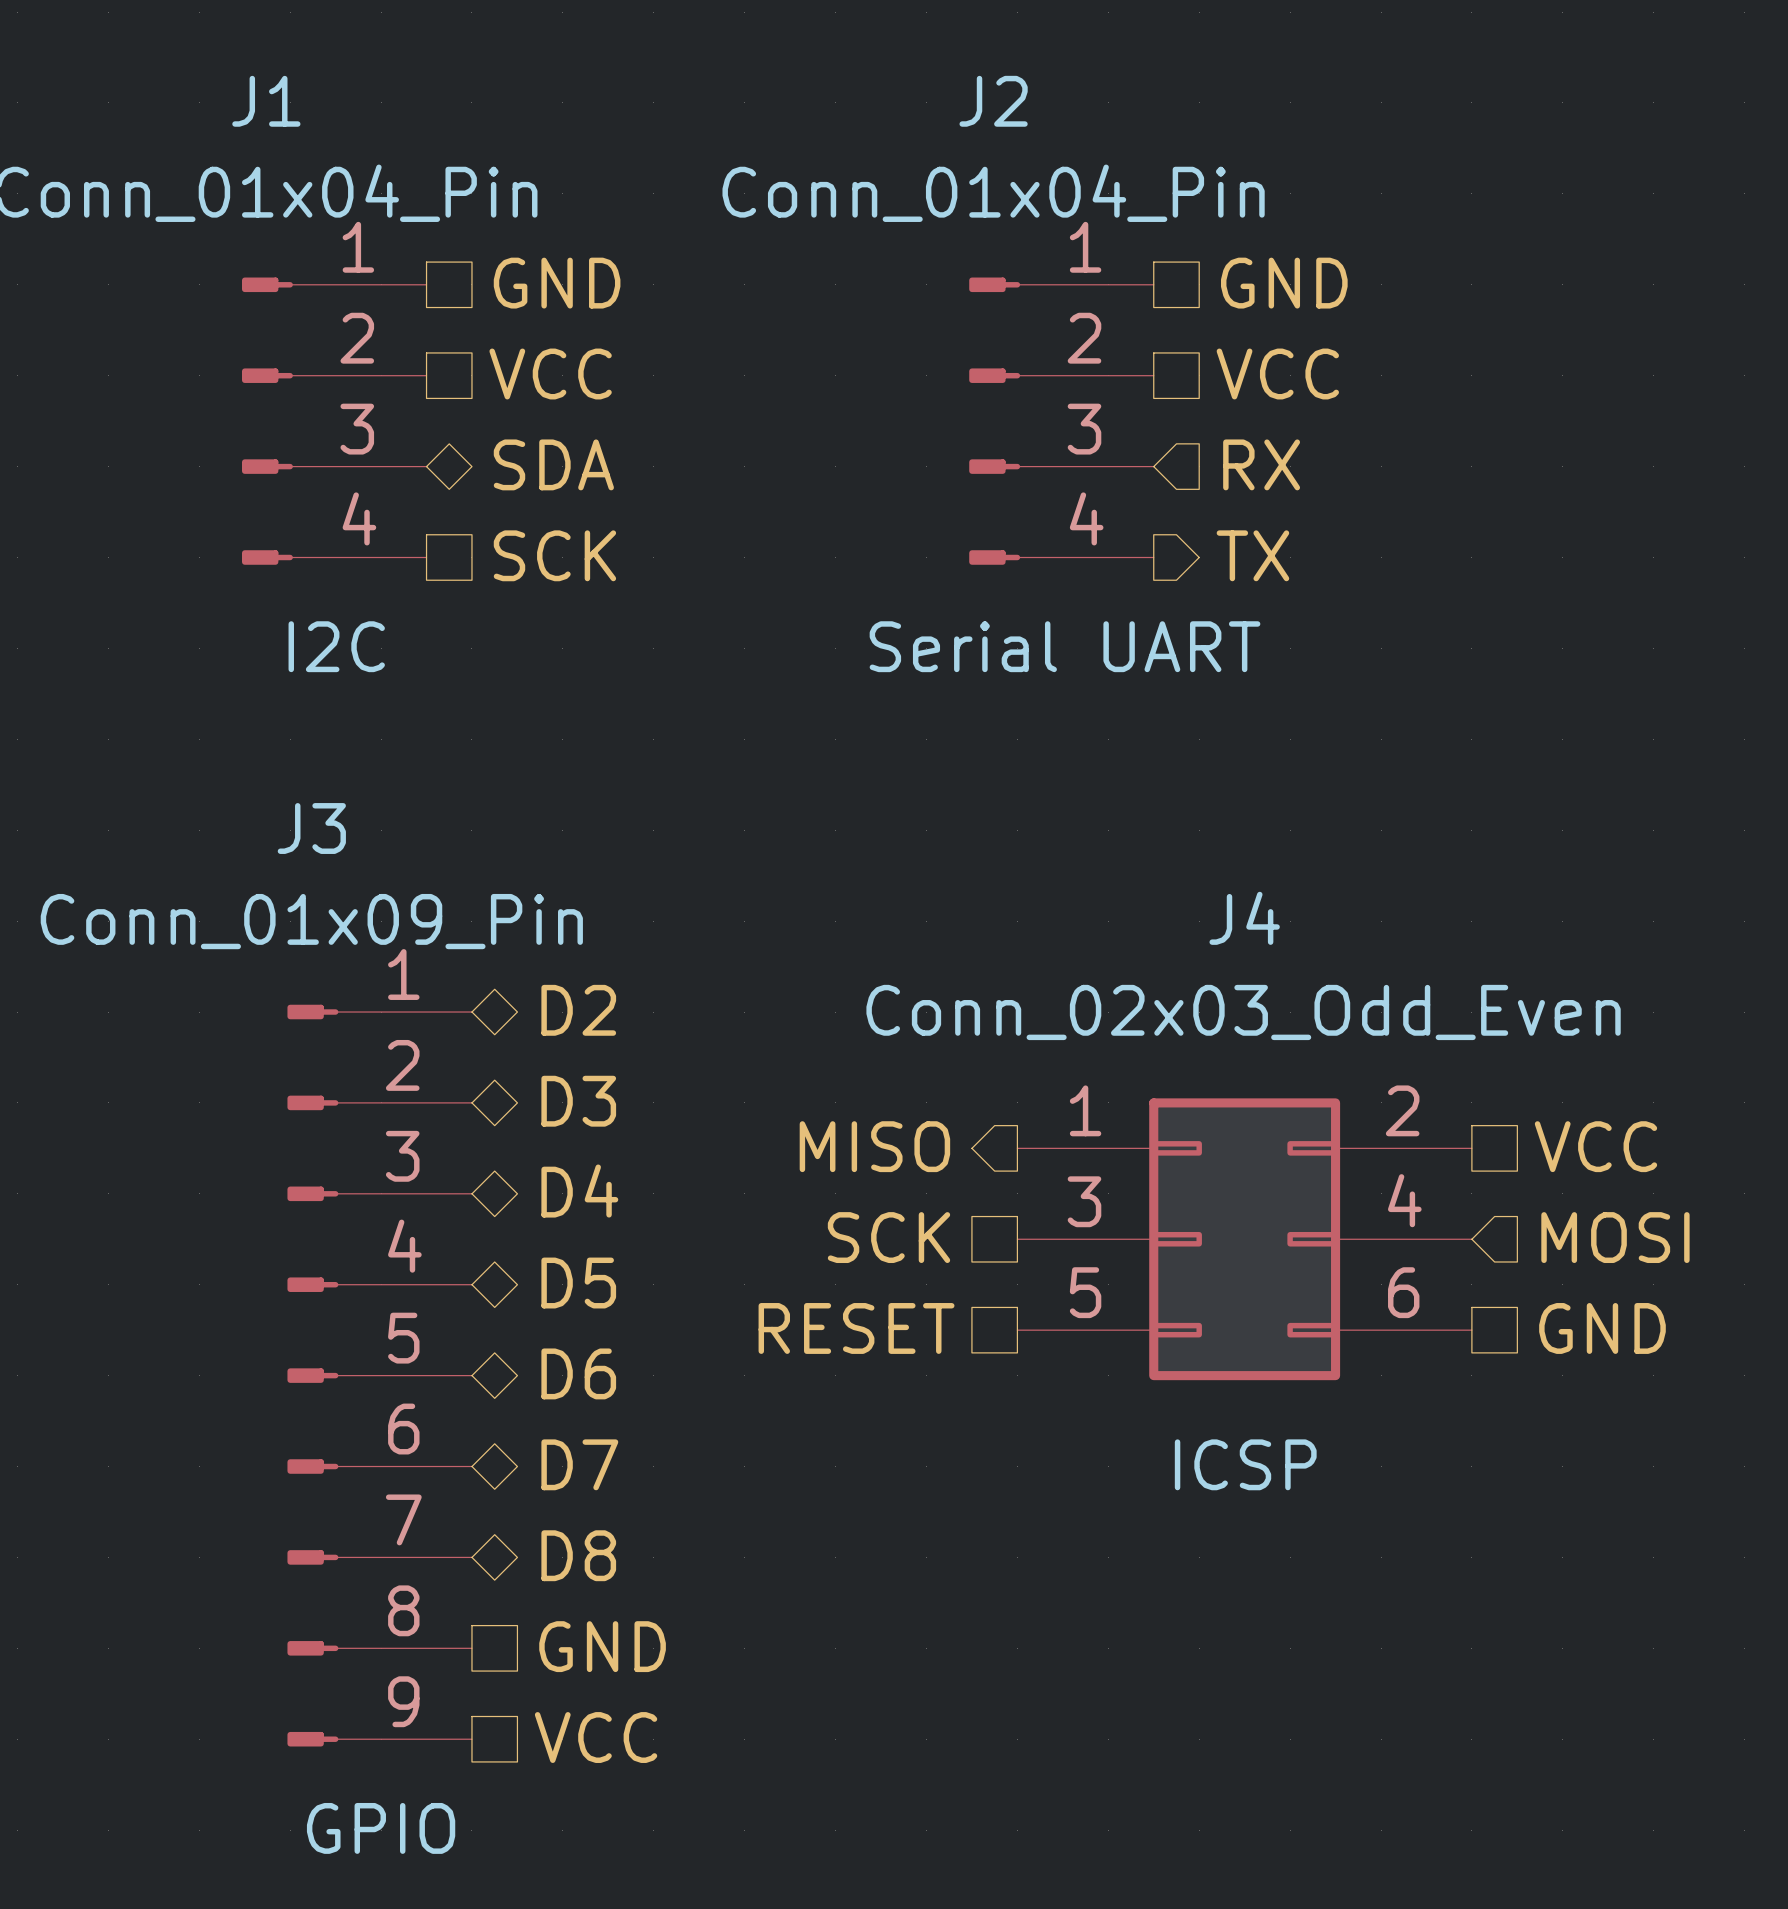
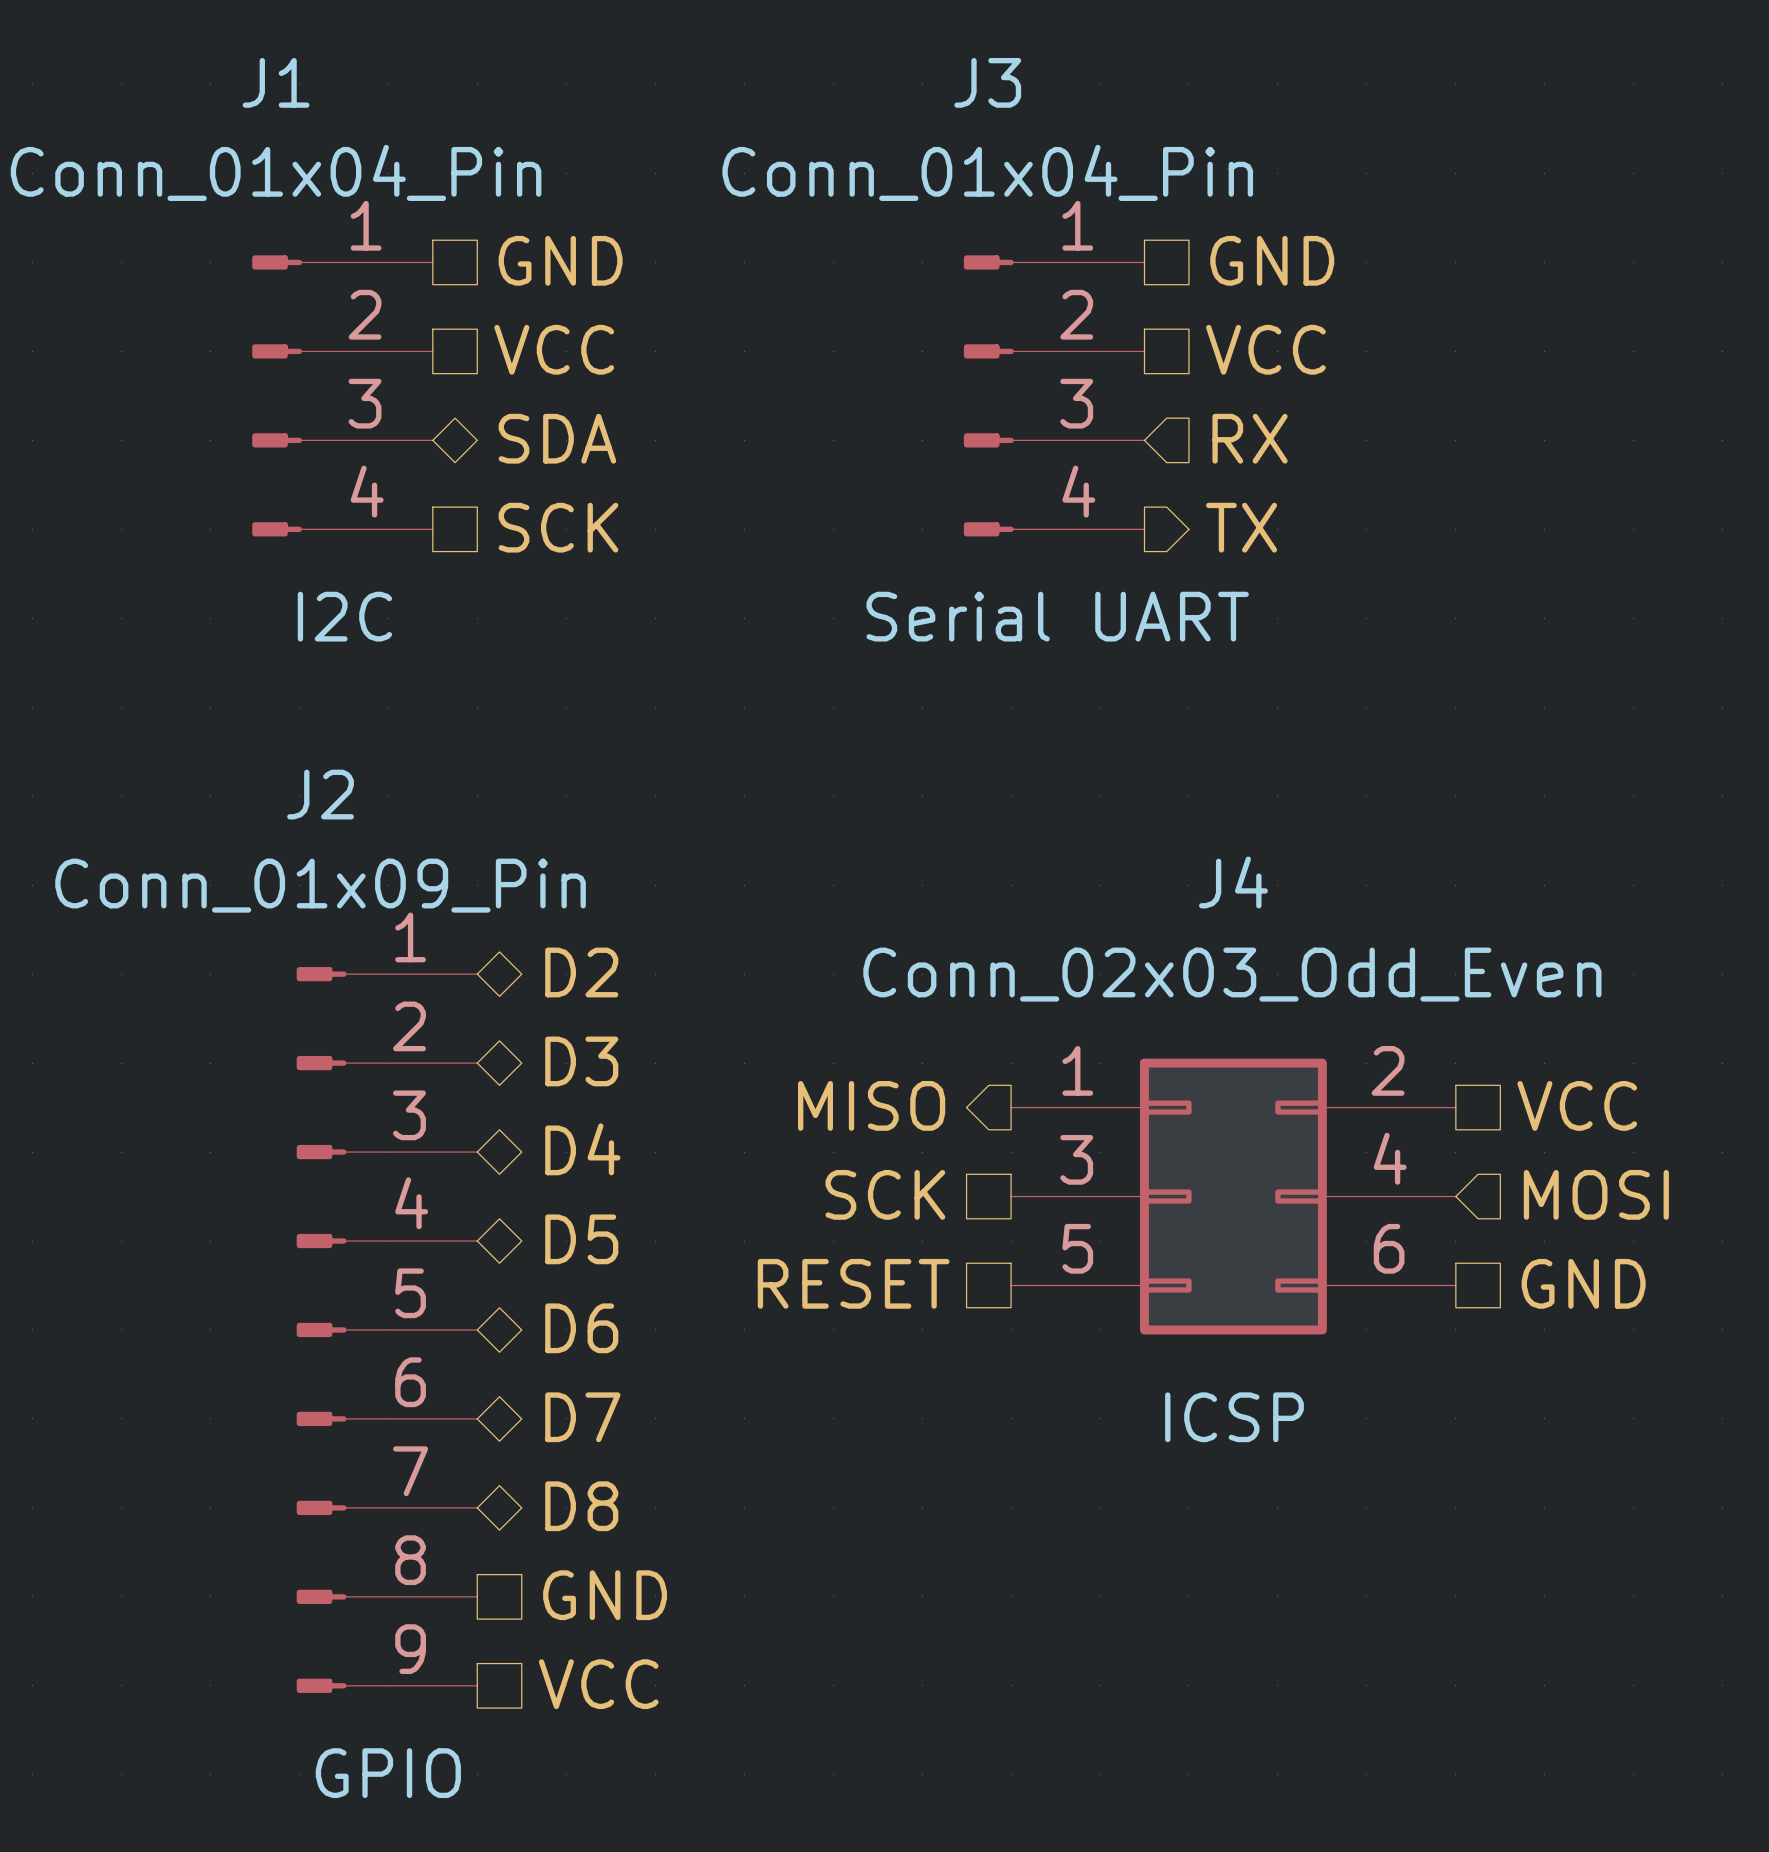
J2 name: J2 (993, 101) -> J3 (987, 82)
J3 name: J3 (311, 828) -> J2 (320, 794)

